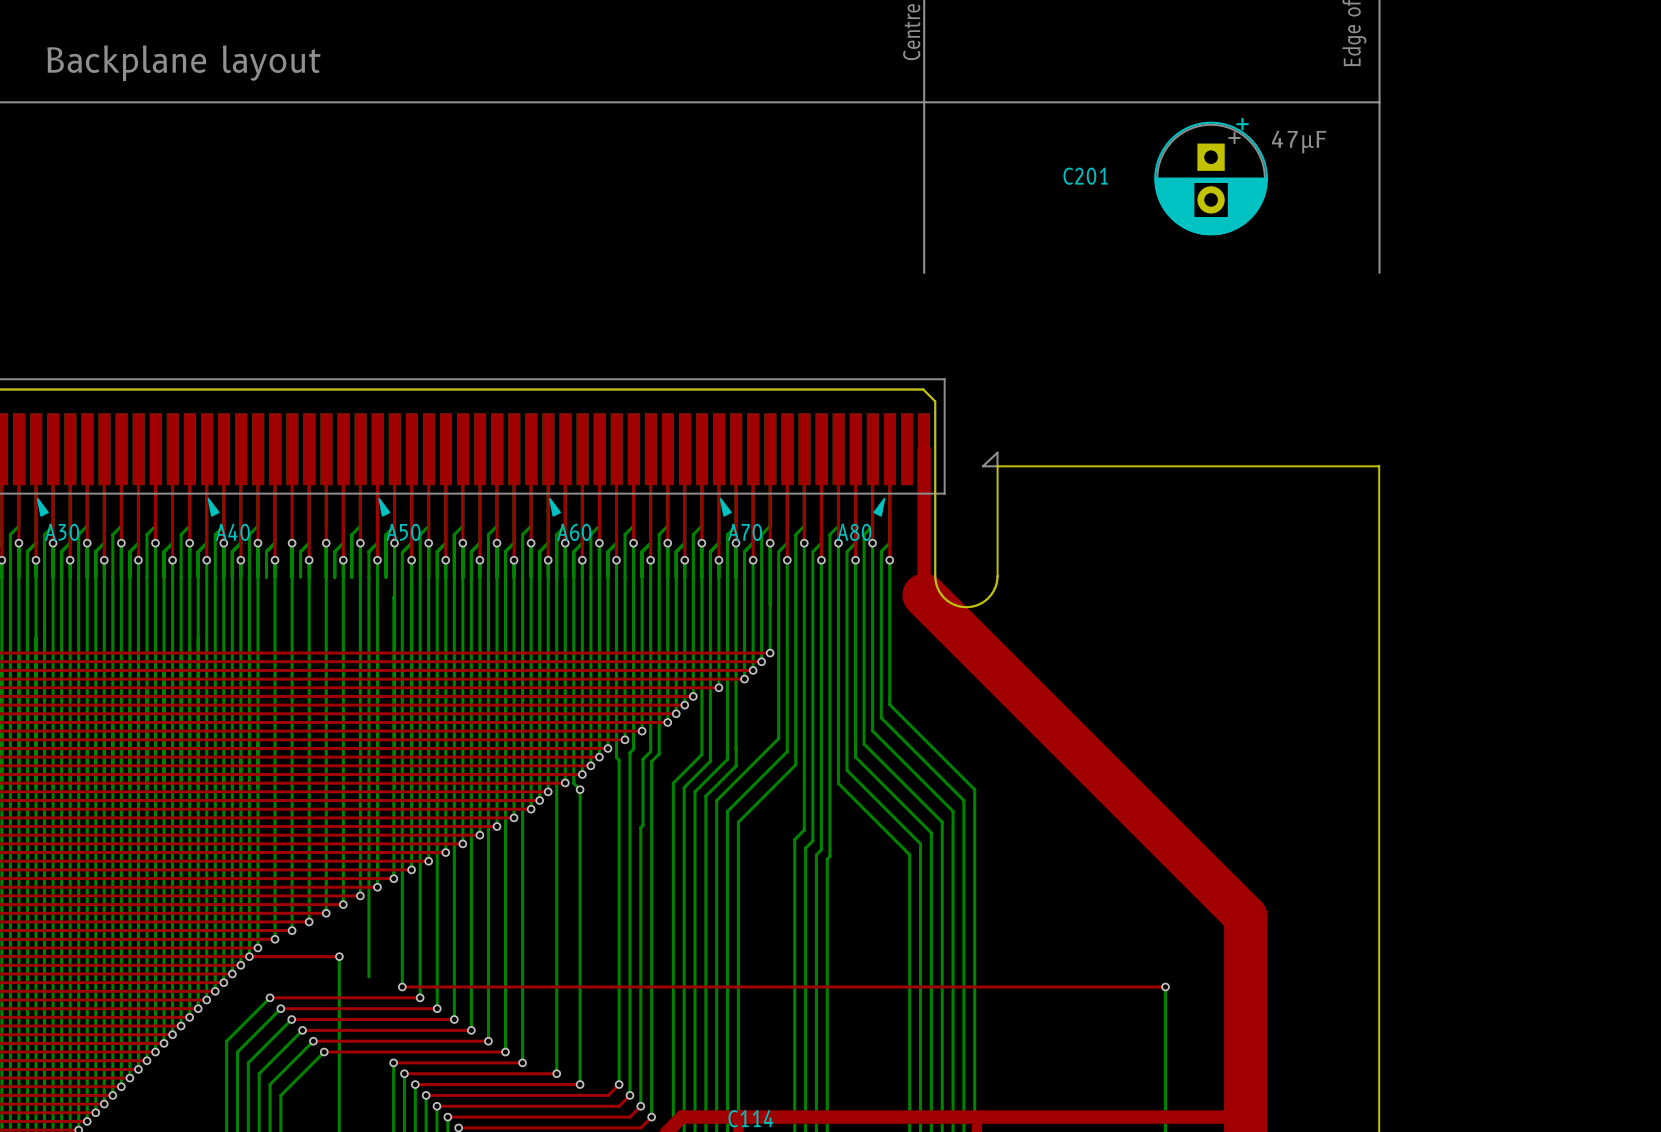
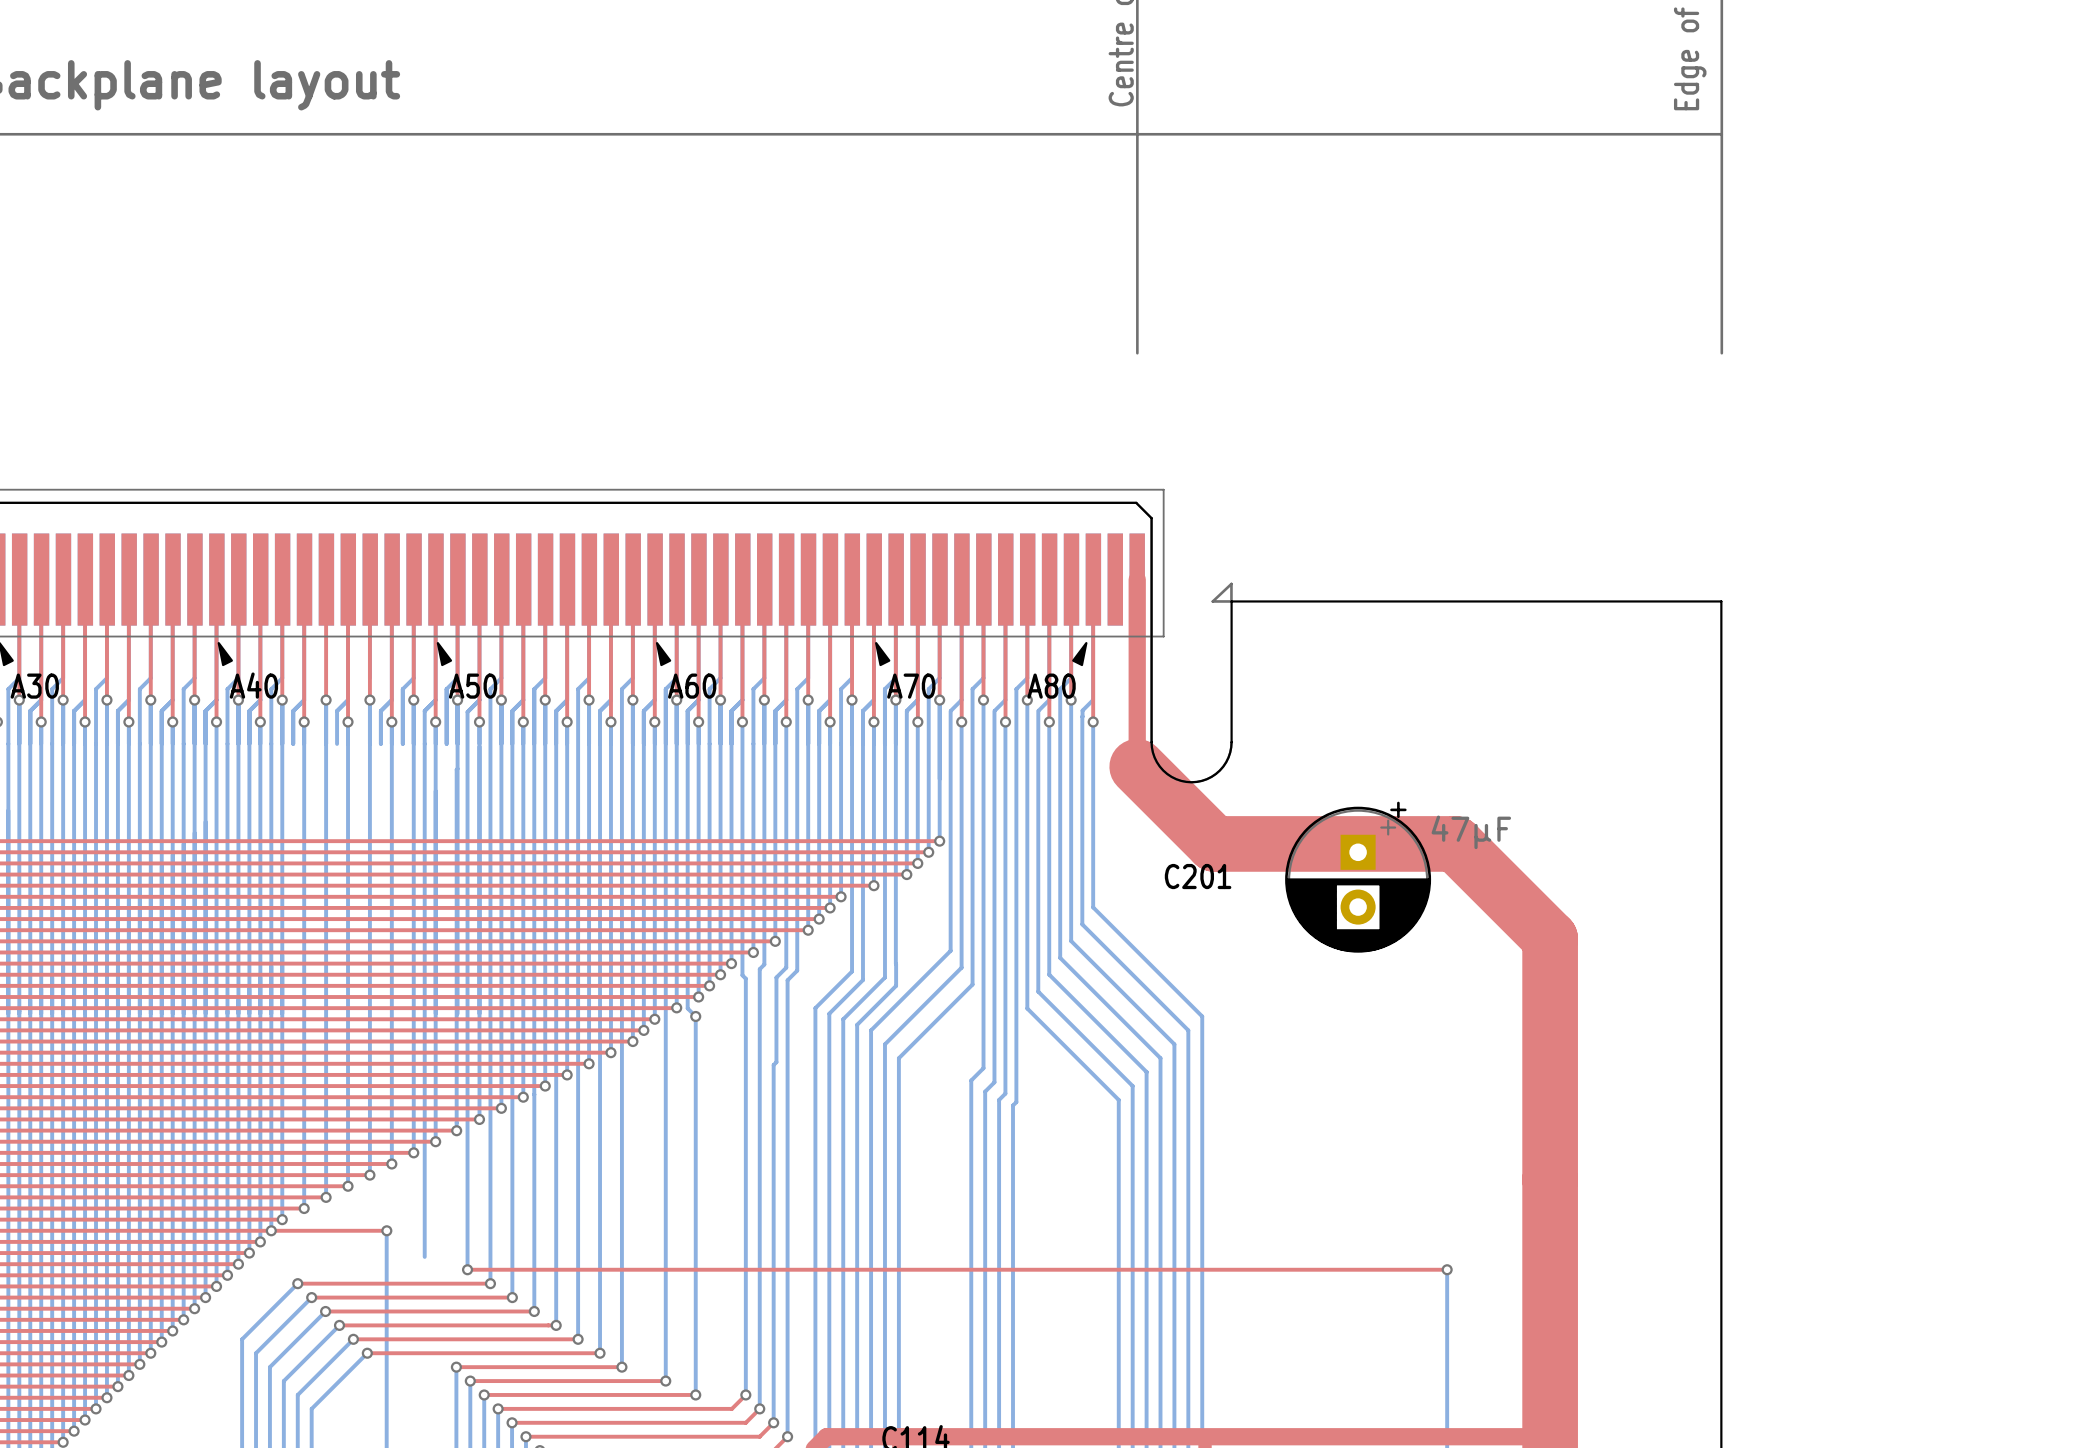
C201 position: (1211, 176) -> (1358, 877)
top track: (984, 655) (1245, 916) -> (1214, 843) (1455, 843) (1550, 938) (1550, 1179)

